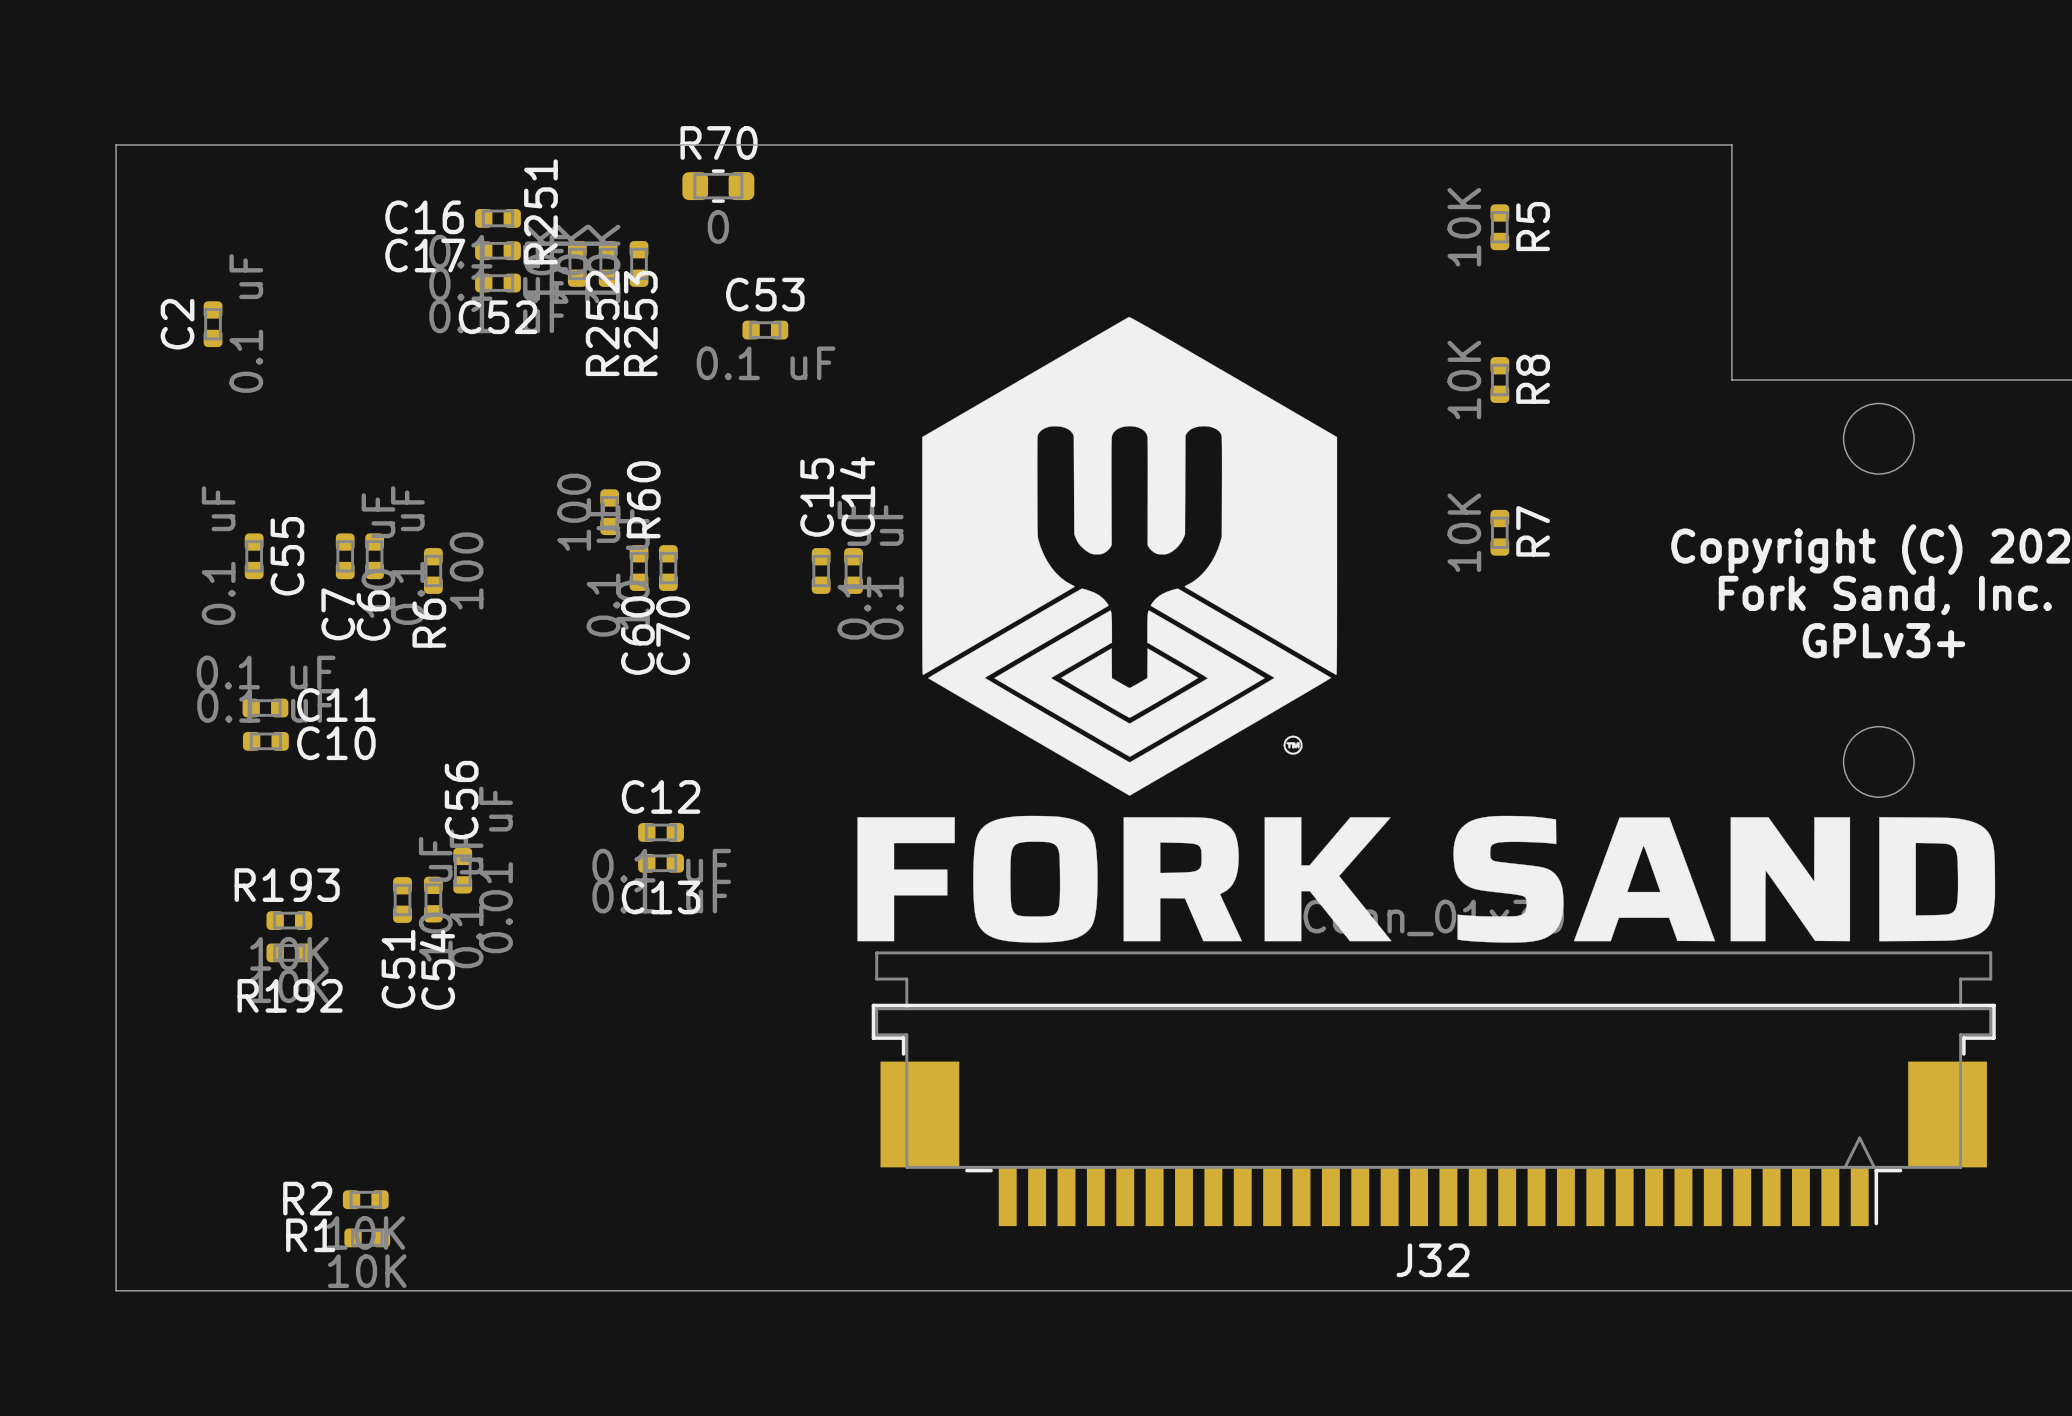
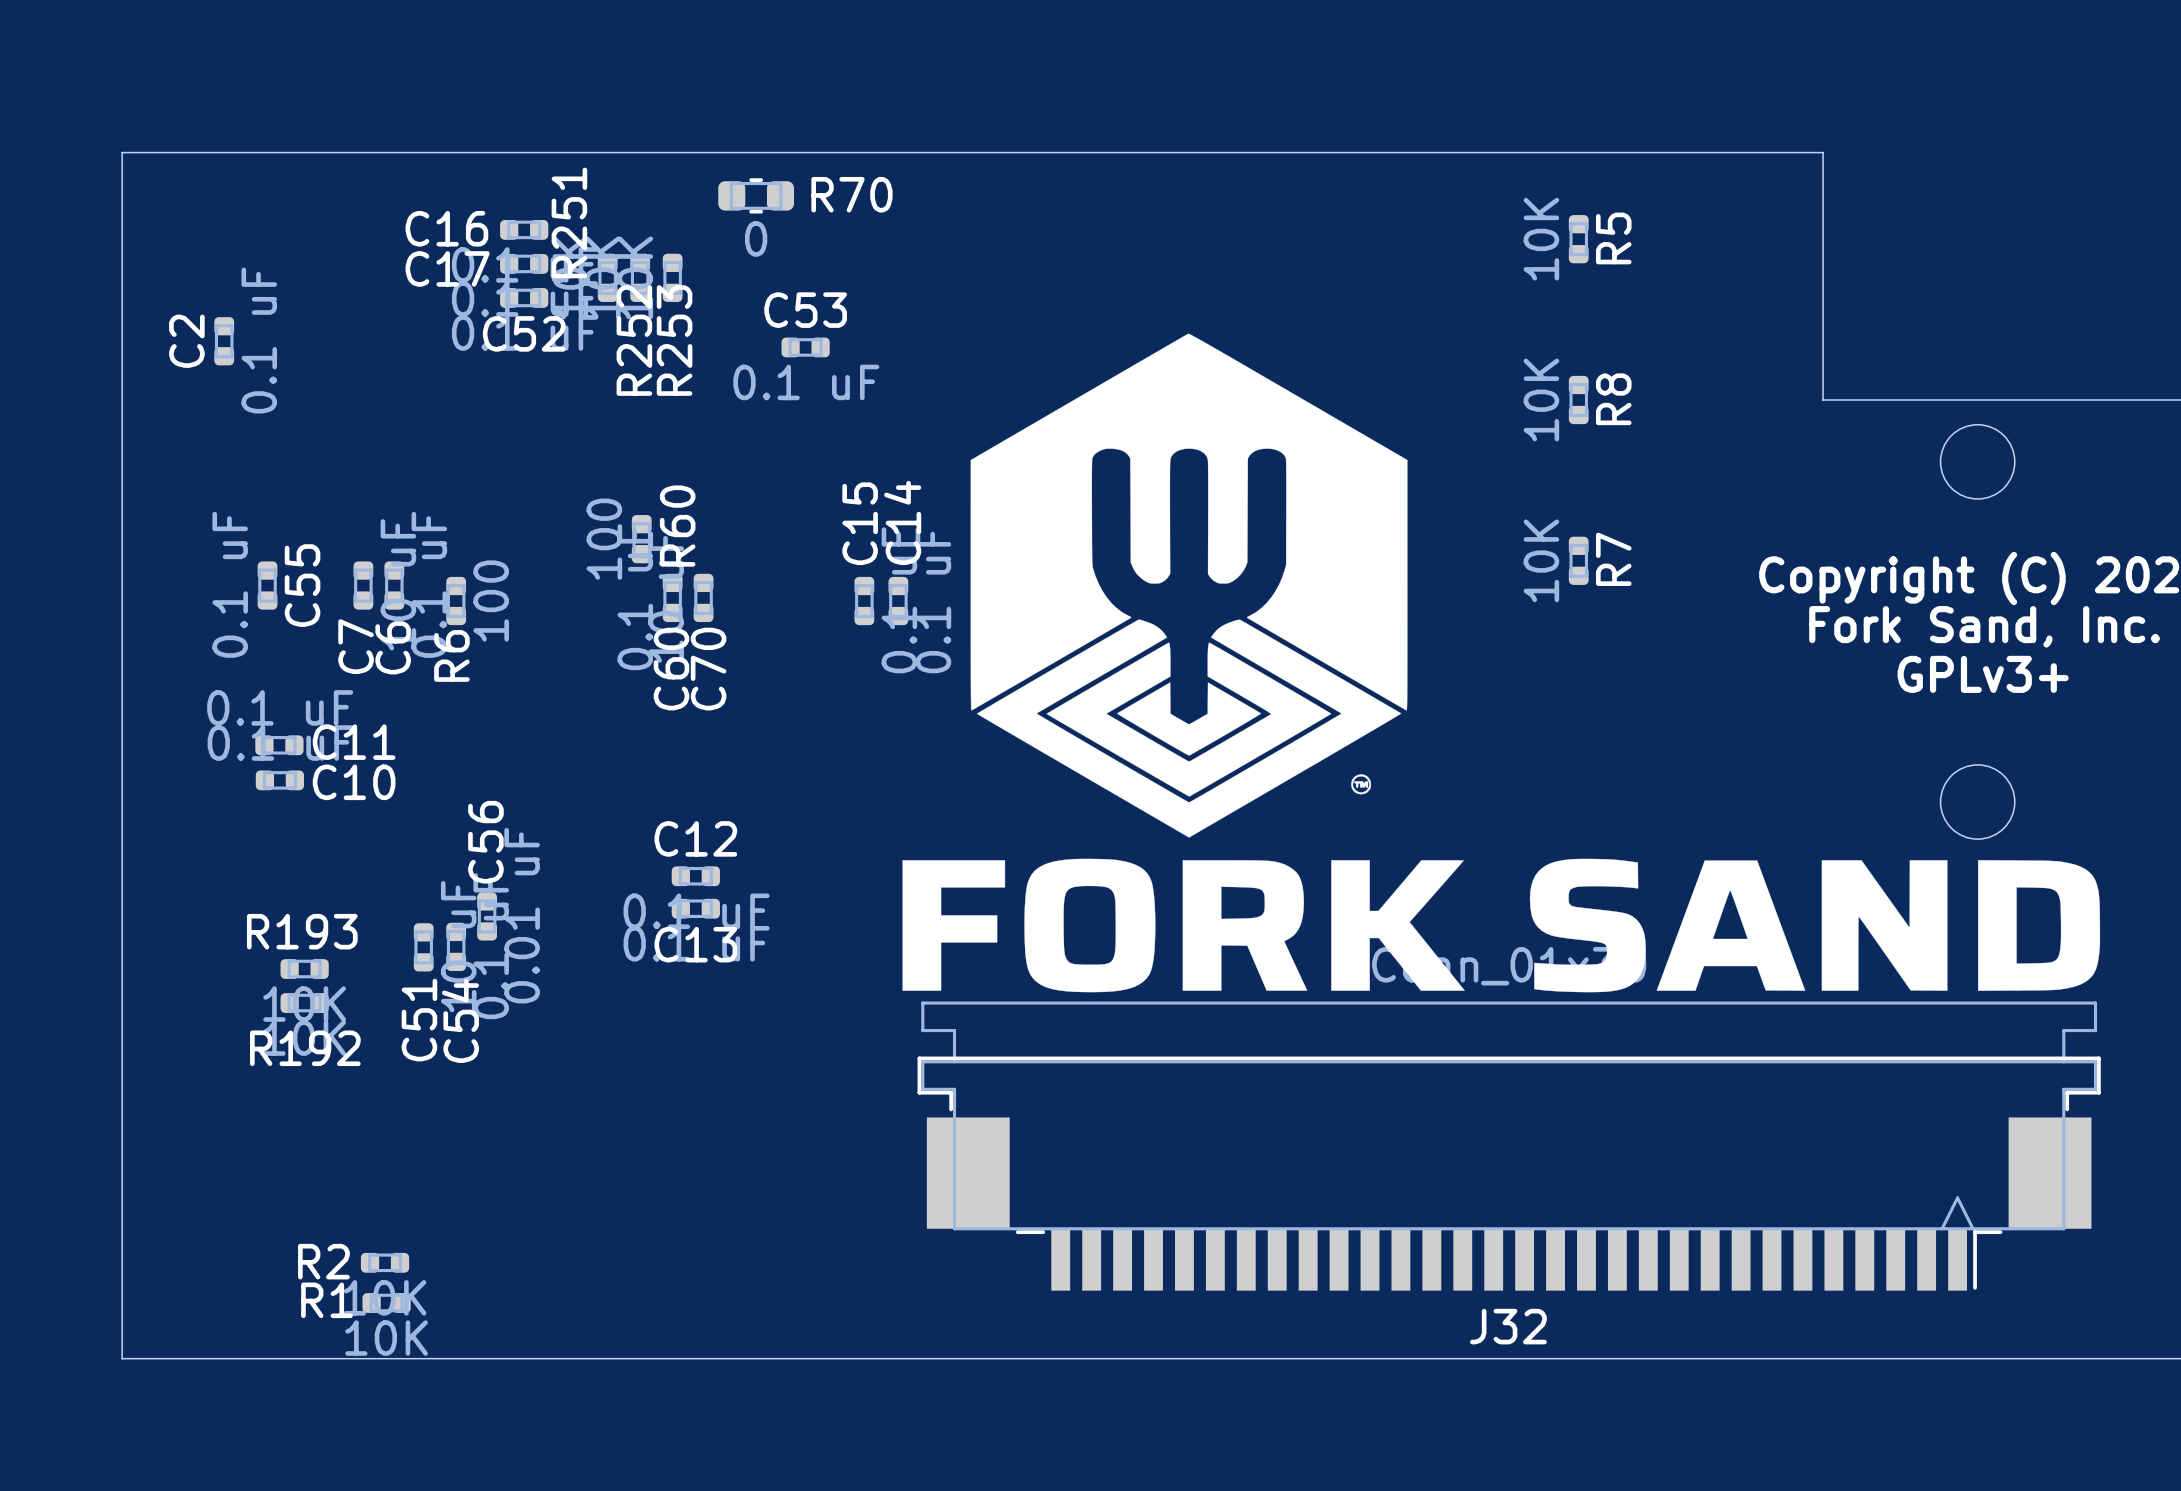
R70 name position: R70 (719, 142) -> R70 (851, 194)

